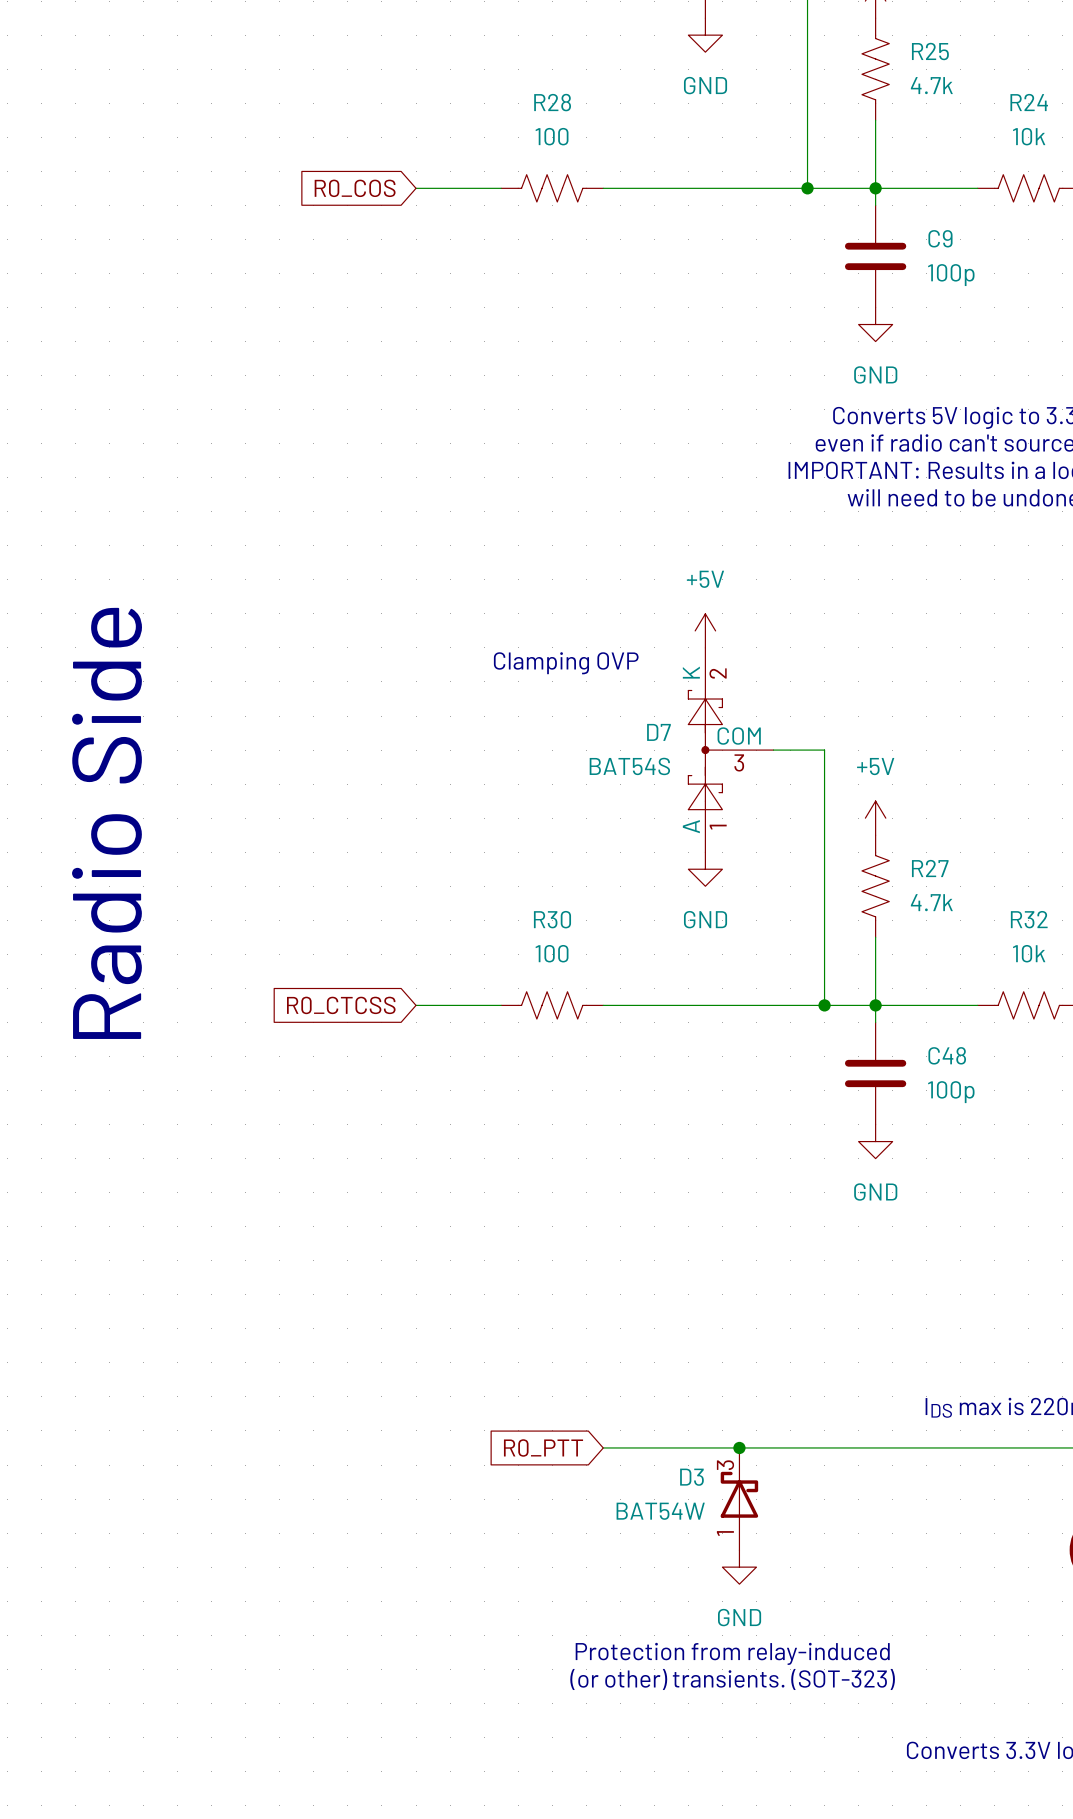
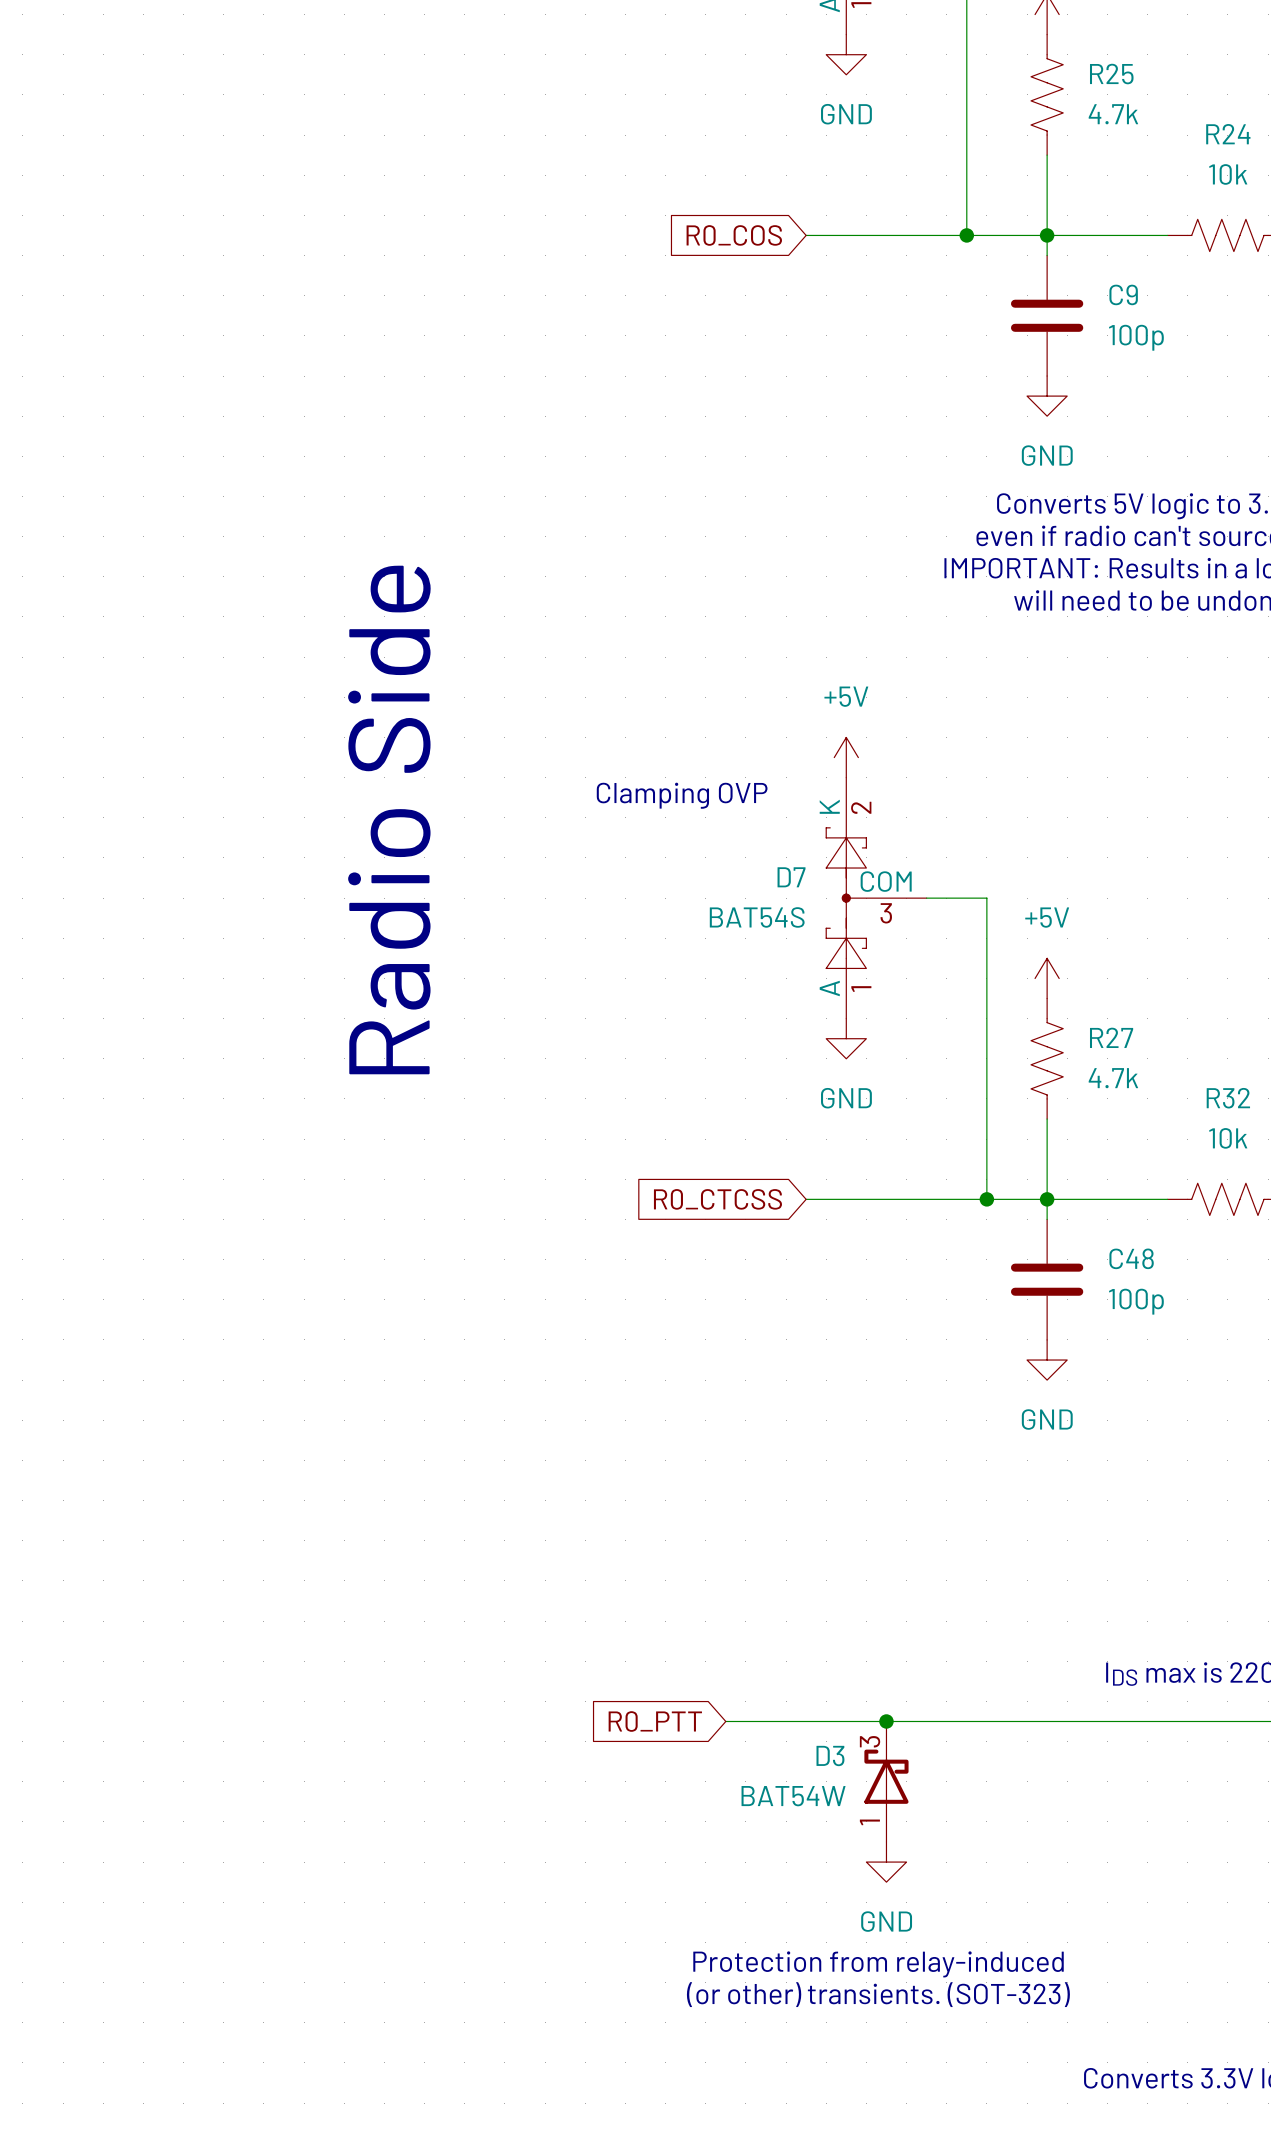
global label position: R0_COS (355, 188) -> R0_COS (734, 235)
wire: (416, 188) (501, 188) -> none
R28: 100 (552, 188) -> none
wire: (603, 188) (671, 188) -> none
text position: Radio Side (107, 823) -> Radio Side (389, 819)
global label position: R0_CTCSS (341, 1005) -> R0_CTCSS (717, 1199)
wire: (416, 1005) (501, 1005) -> none
R30: 100 (552, 1005) -> none
wire: (603, 1005) (671, 1005) -> none

